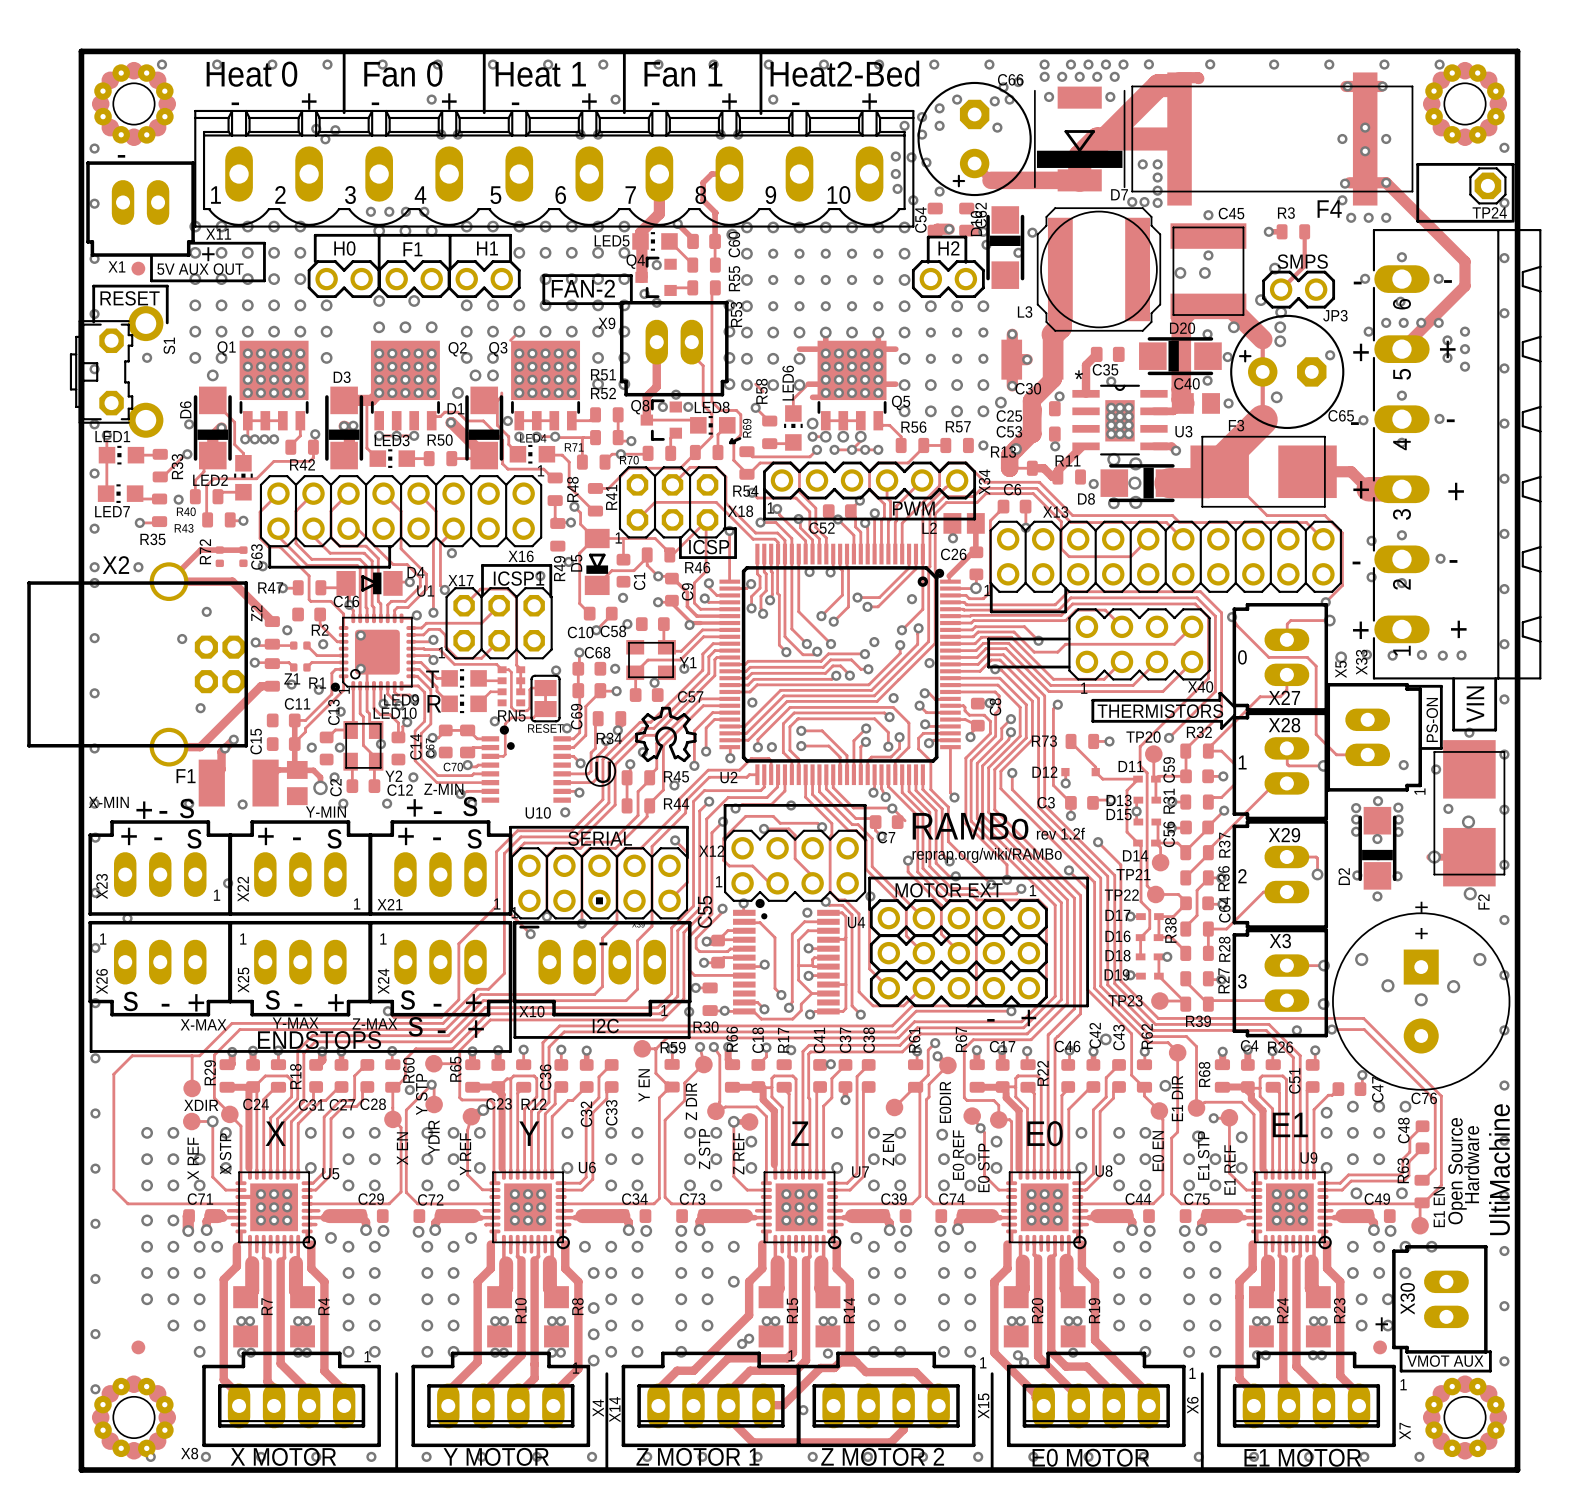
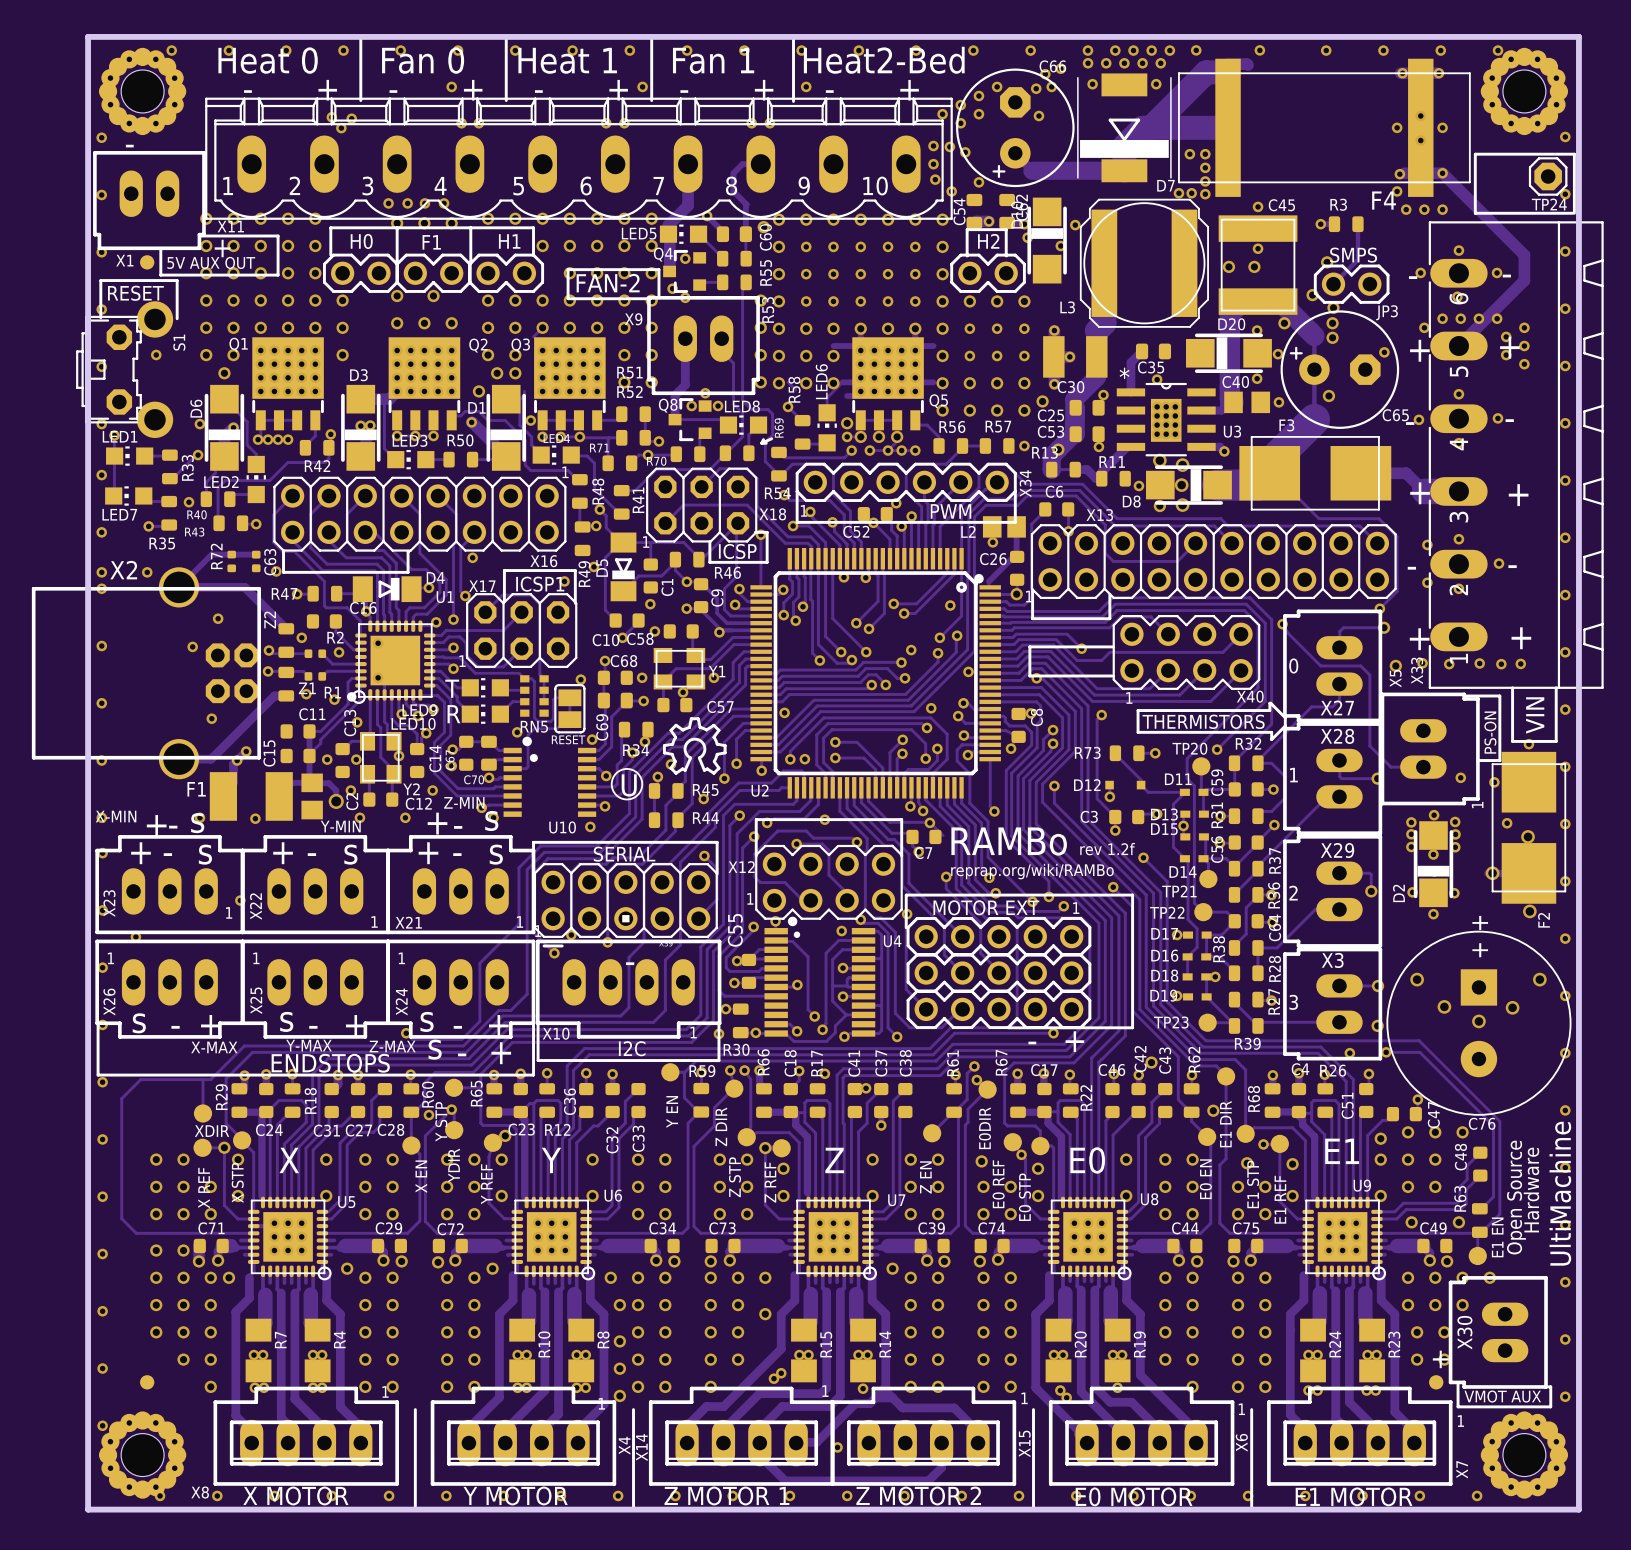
U1 footprint: [338, 613, 417, 691] -> [351, 620, 436, 705]

